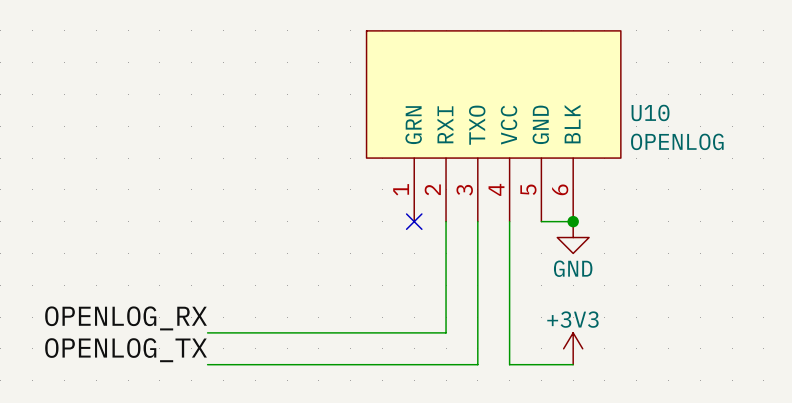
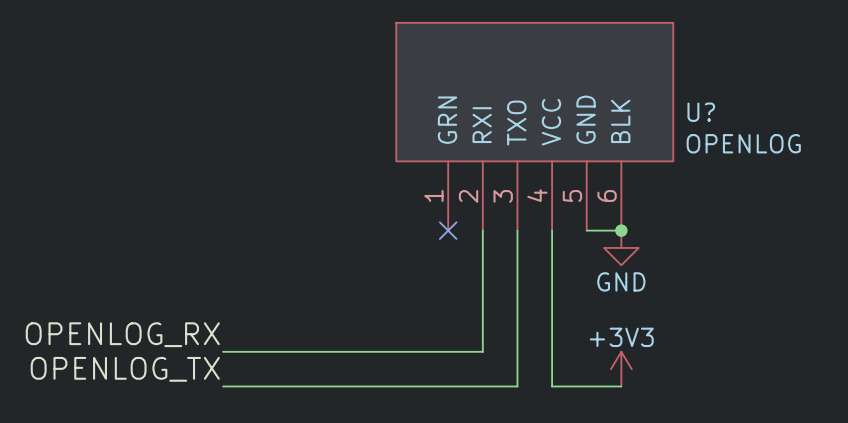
U10 name: U10 (650, 112) -> U? (701, 112)

